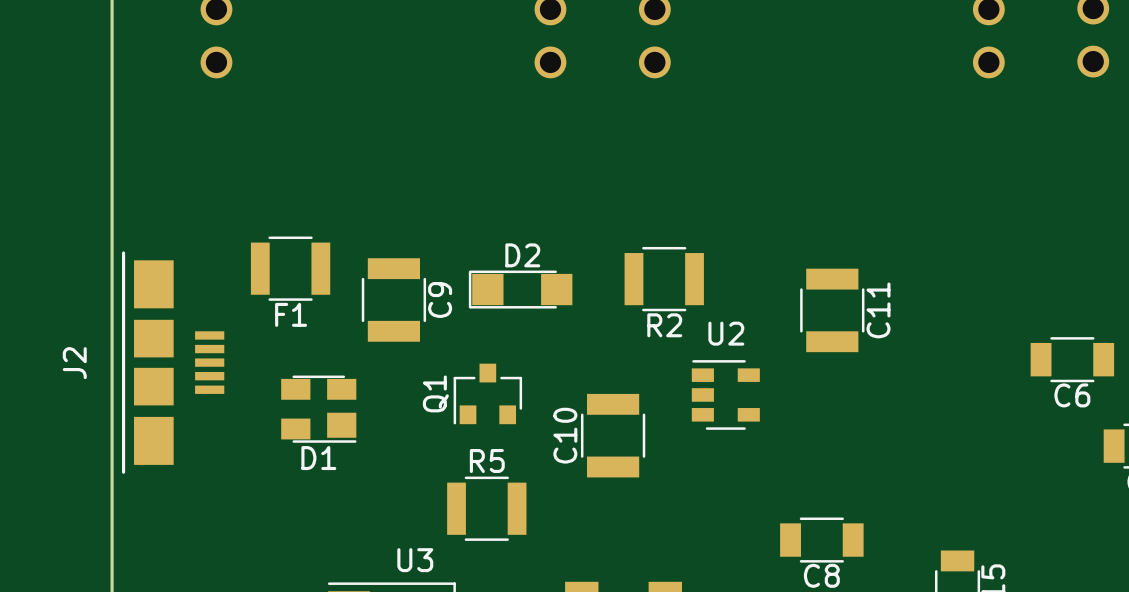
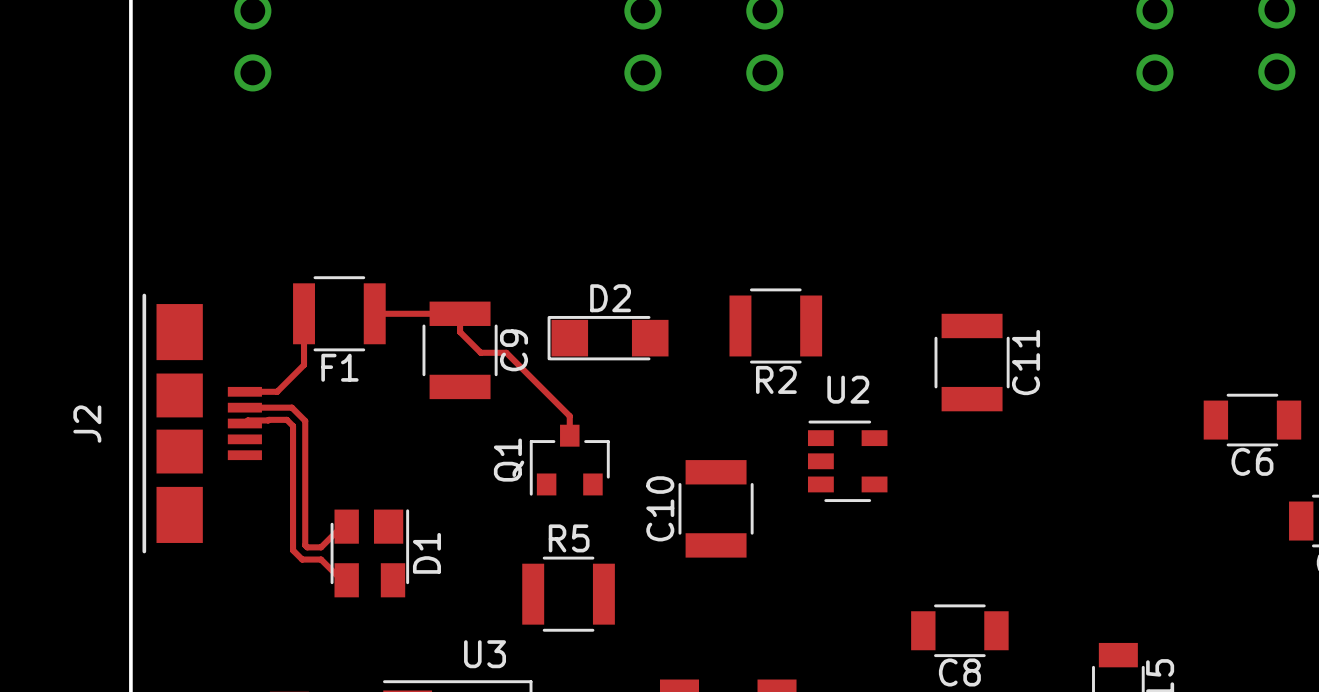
track: none -> (304, 313) (304, 364) (277, 391) (244, 391)
track: none -> (374, 313) (460, 313) (460, 332) (480, 352) (506, 352) (569, 416) (569, 435)
track: none -> (244, 407) (291, 407) (305, 420) (305, 545) (307, 547) (321, 547) (341, 526) (346, 526)
track: none -> (244, 423) (247, 420) (286, 419) (293, 426) (293, 550) (302, 559) (321, 559) (341, 580) (346, 580)
D1 rotation: 0° (318, 409) -> 90° counterclockwise (369, 553)
D1 position: (318, 409) -> (369, 553)

